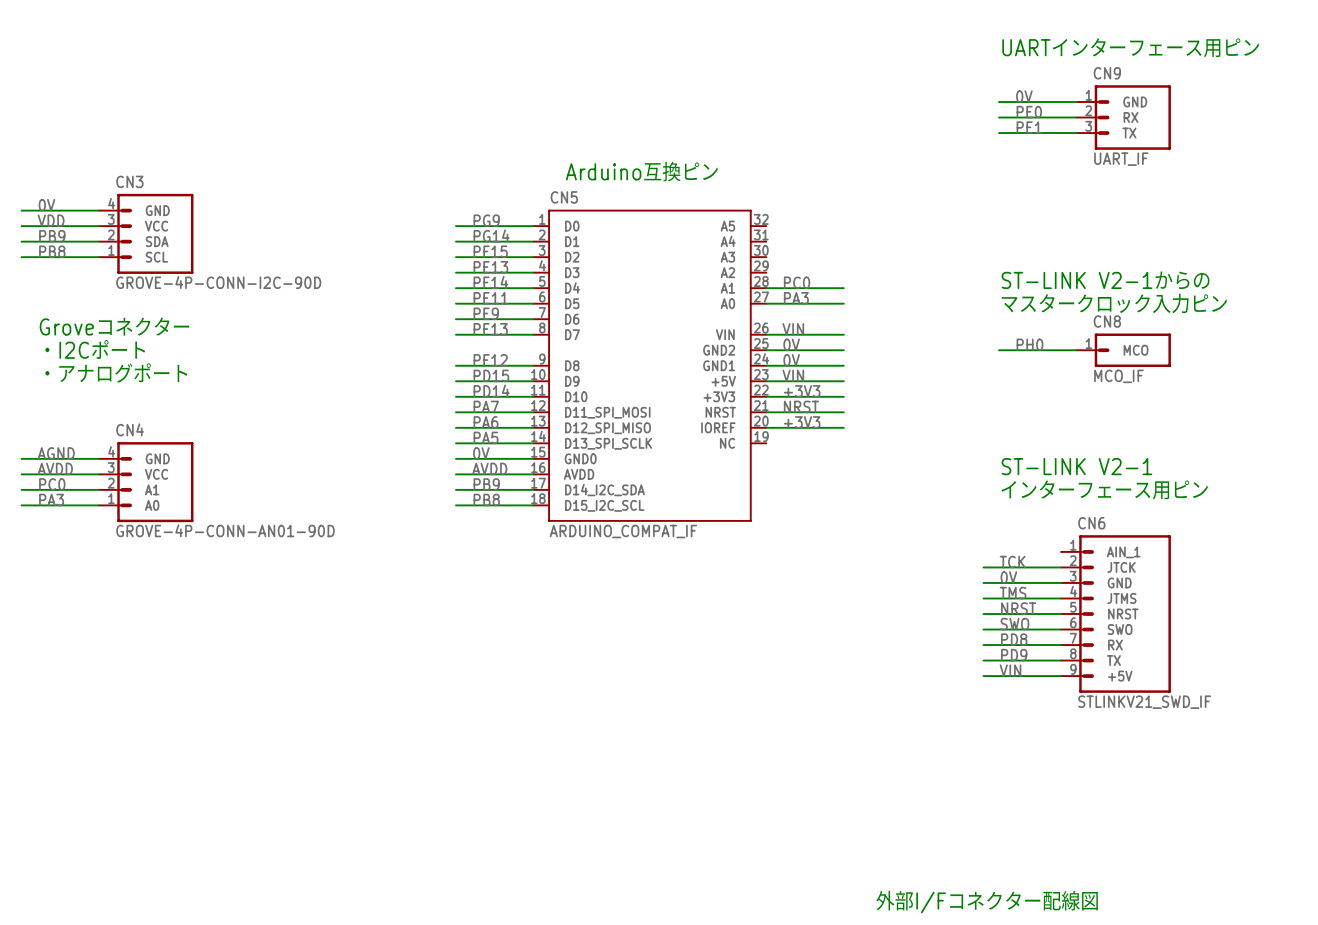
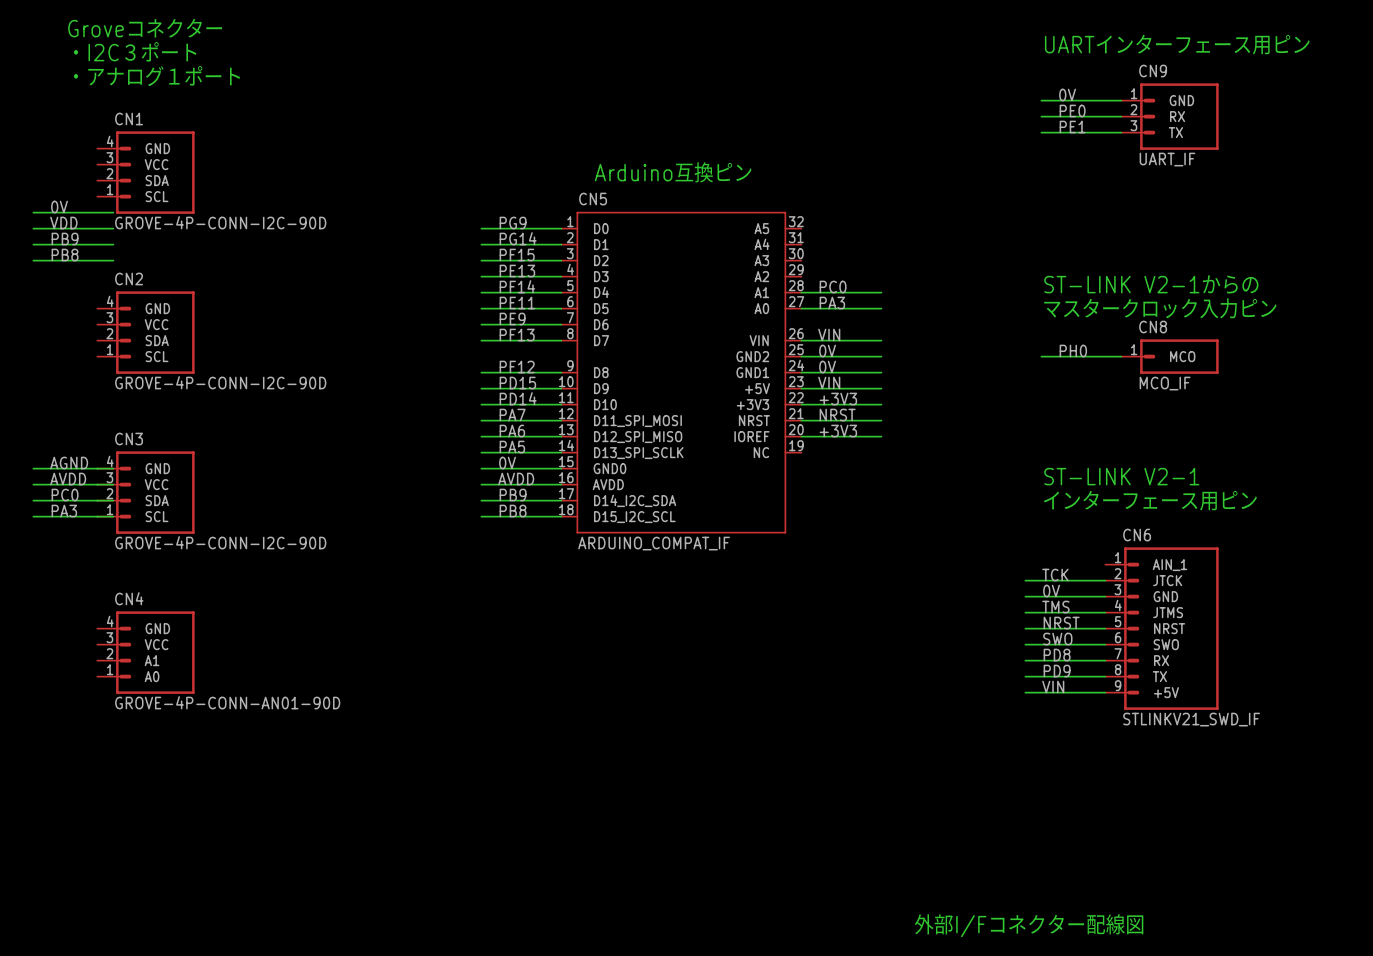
text: none -> Groveコネクター (145, 28)
text: none -> ・I2C３ポート (135, 51)
text: none -> ・アナログ１ポート (156, 76)
CN1: none -> GROVE-4P-CONN-I2C-90D (145, 172)
CN3 position: (146, 233) -> (145, 492)
text: Groveコネクター (114, 326) -> none
CN2: none -> GROVE-4P-CONN-I2C-90D (145, 332)
text: ・I2Cポート (95, 349) -> none
text: ・アナログポート (116, 373) -> none
CN4 position: (146, 482) -> (145, 652)

